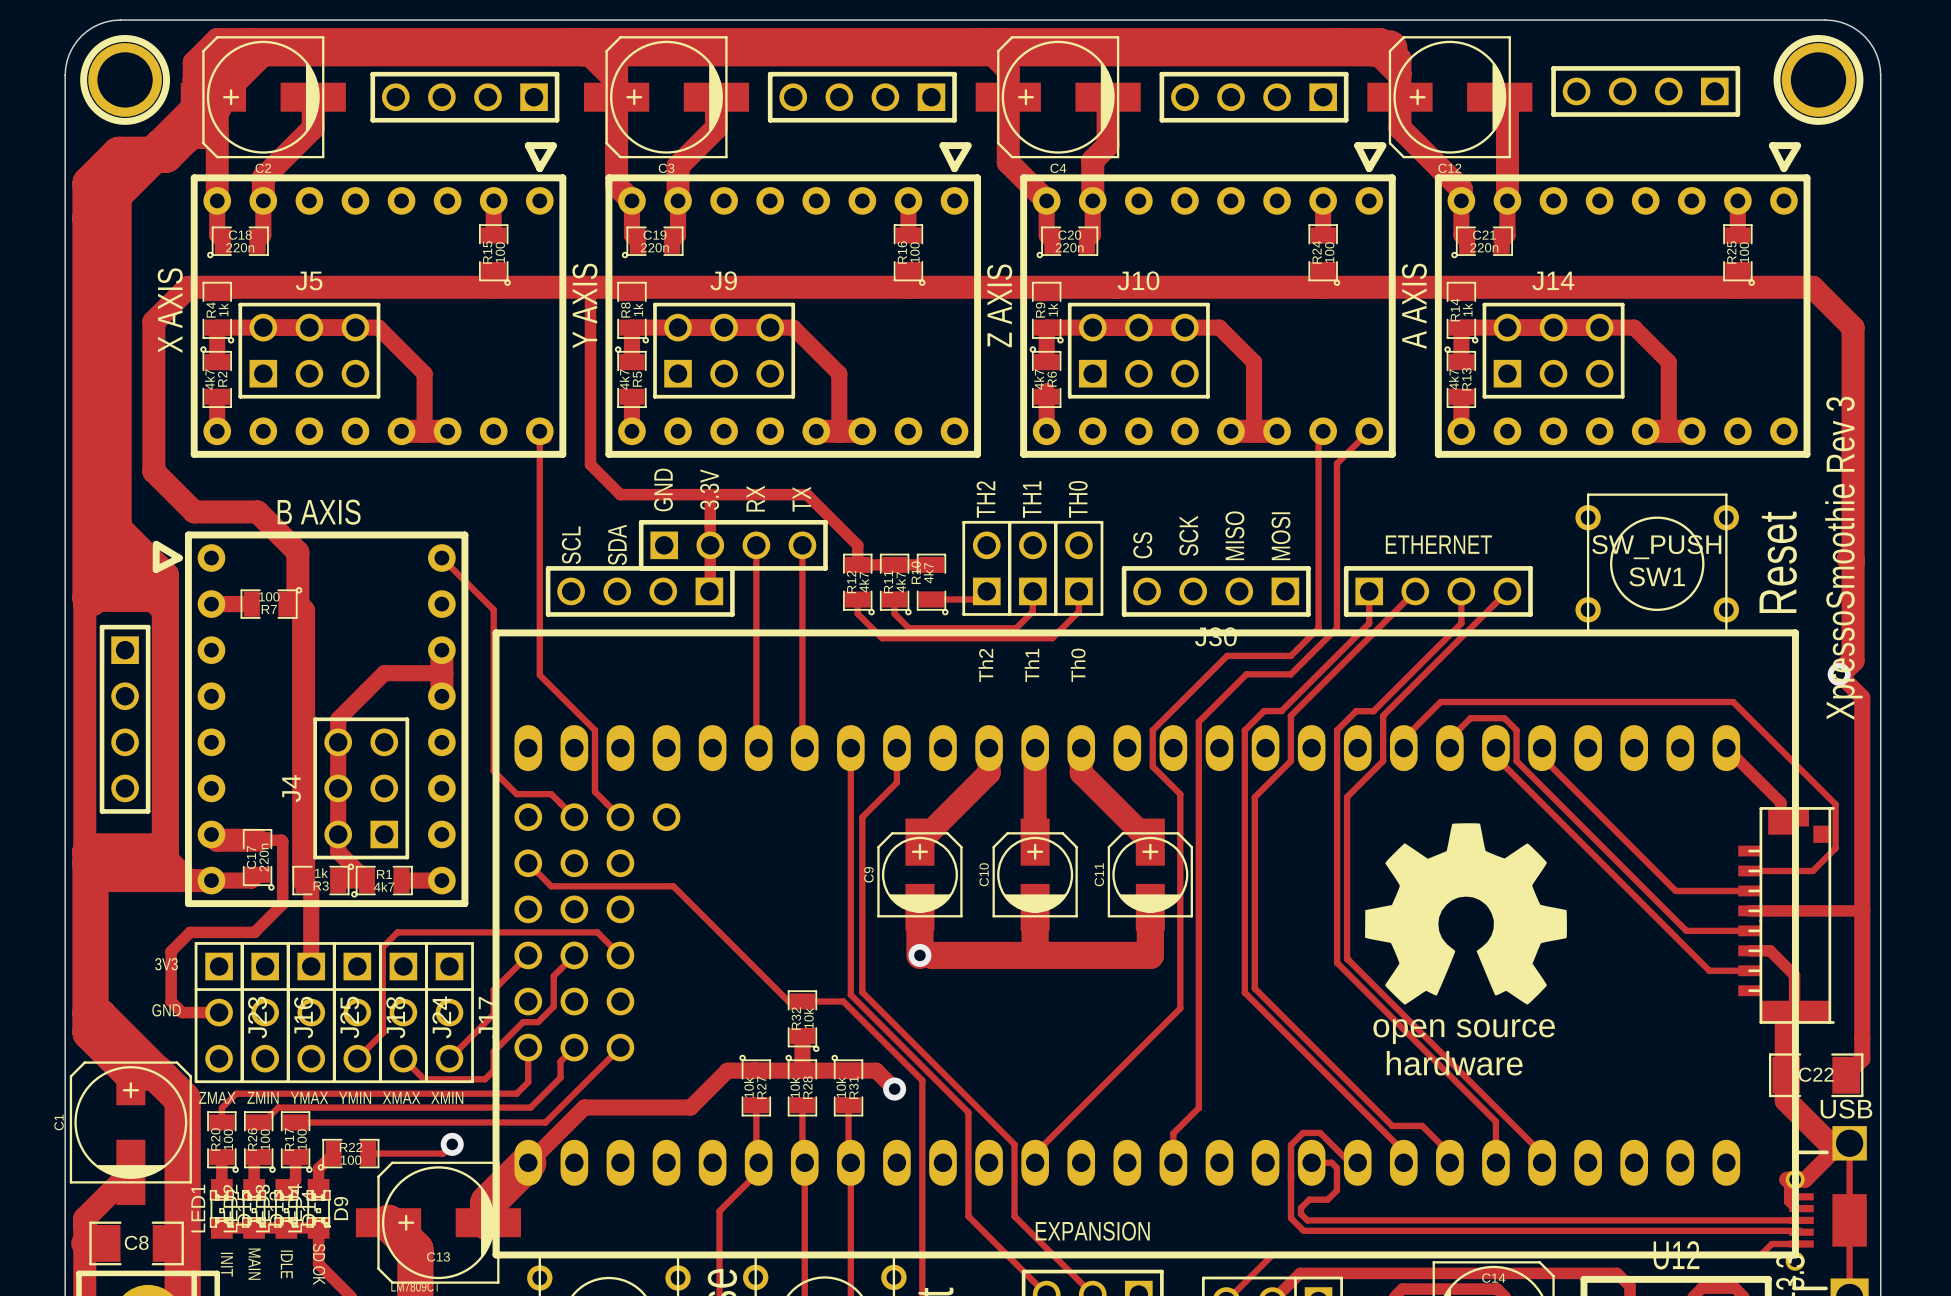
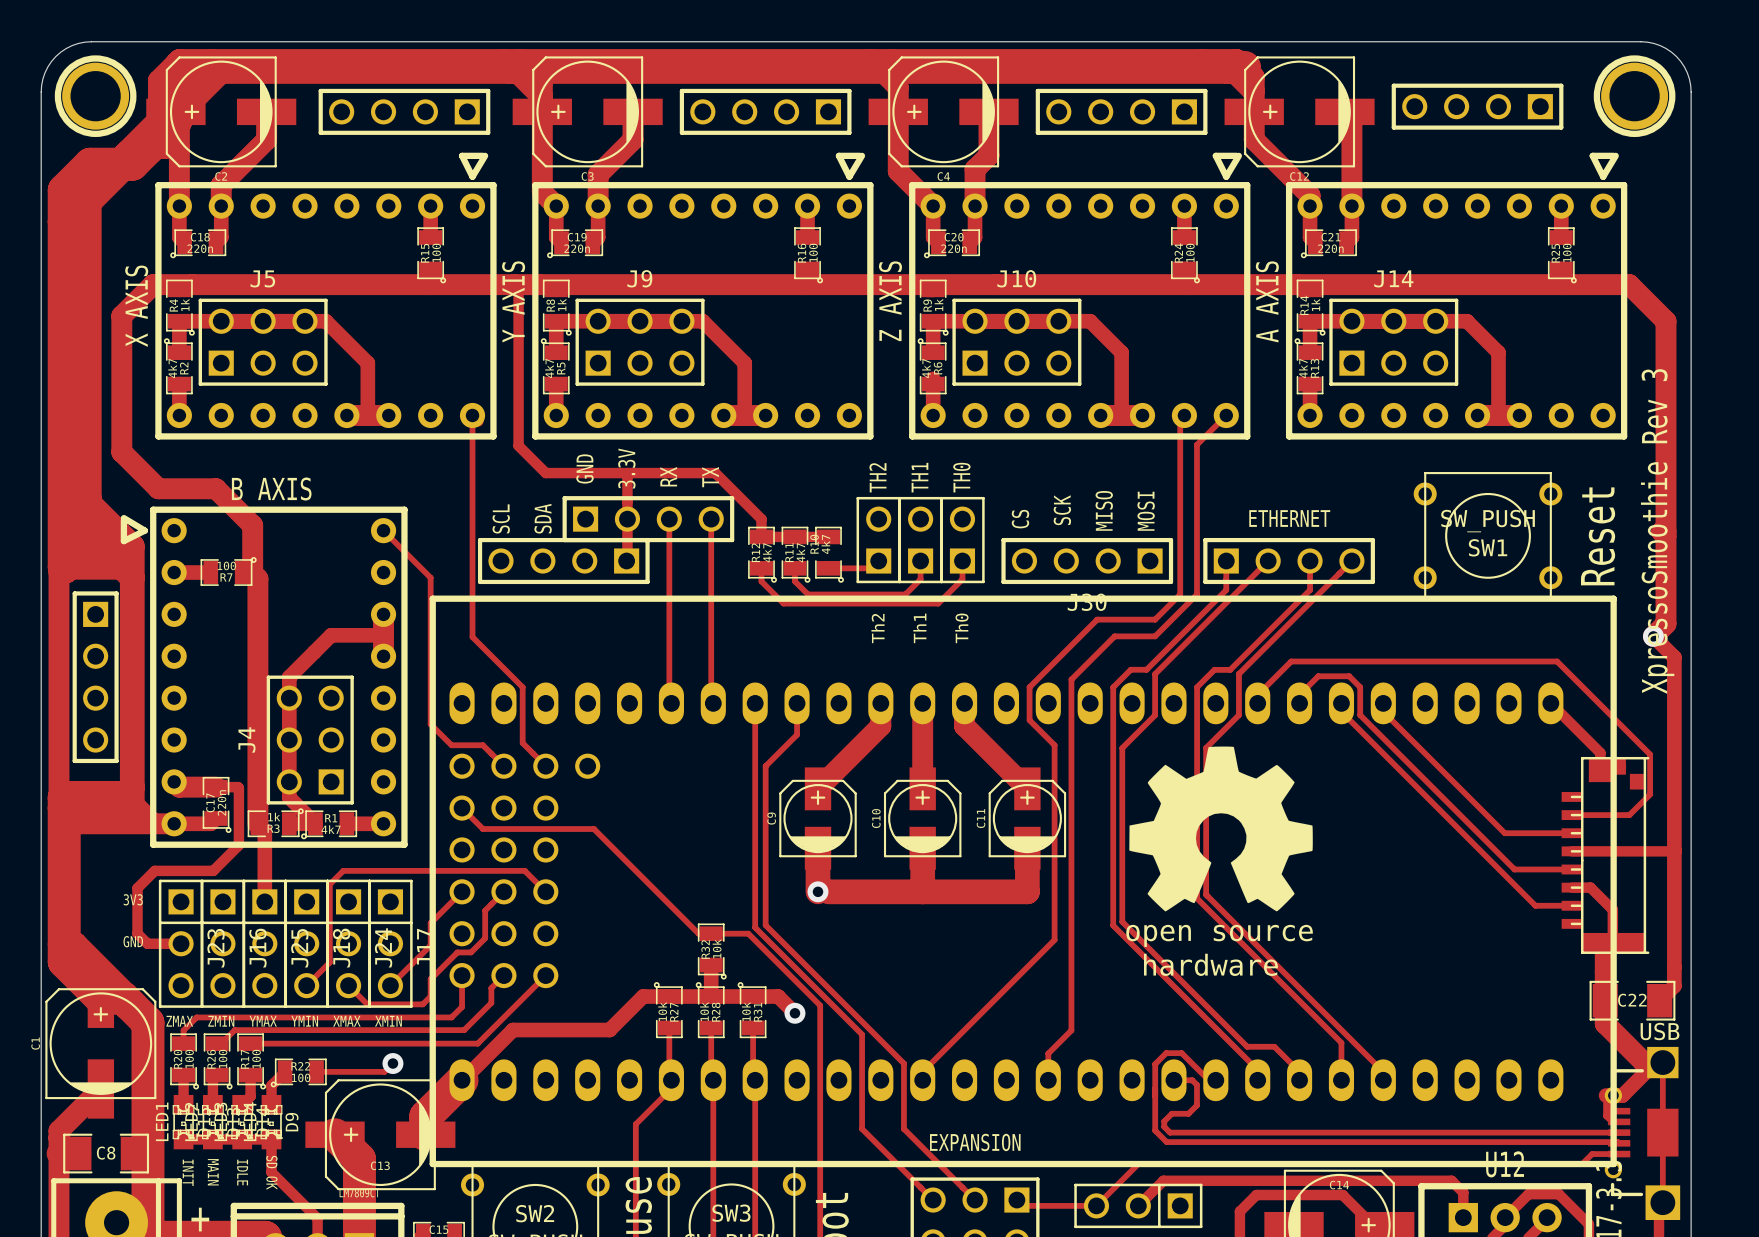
drawing position: (1465, 913) -> (1221, 828)

